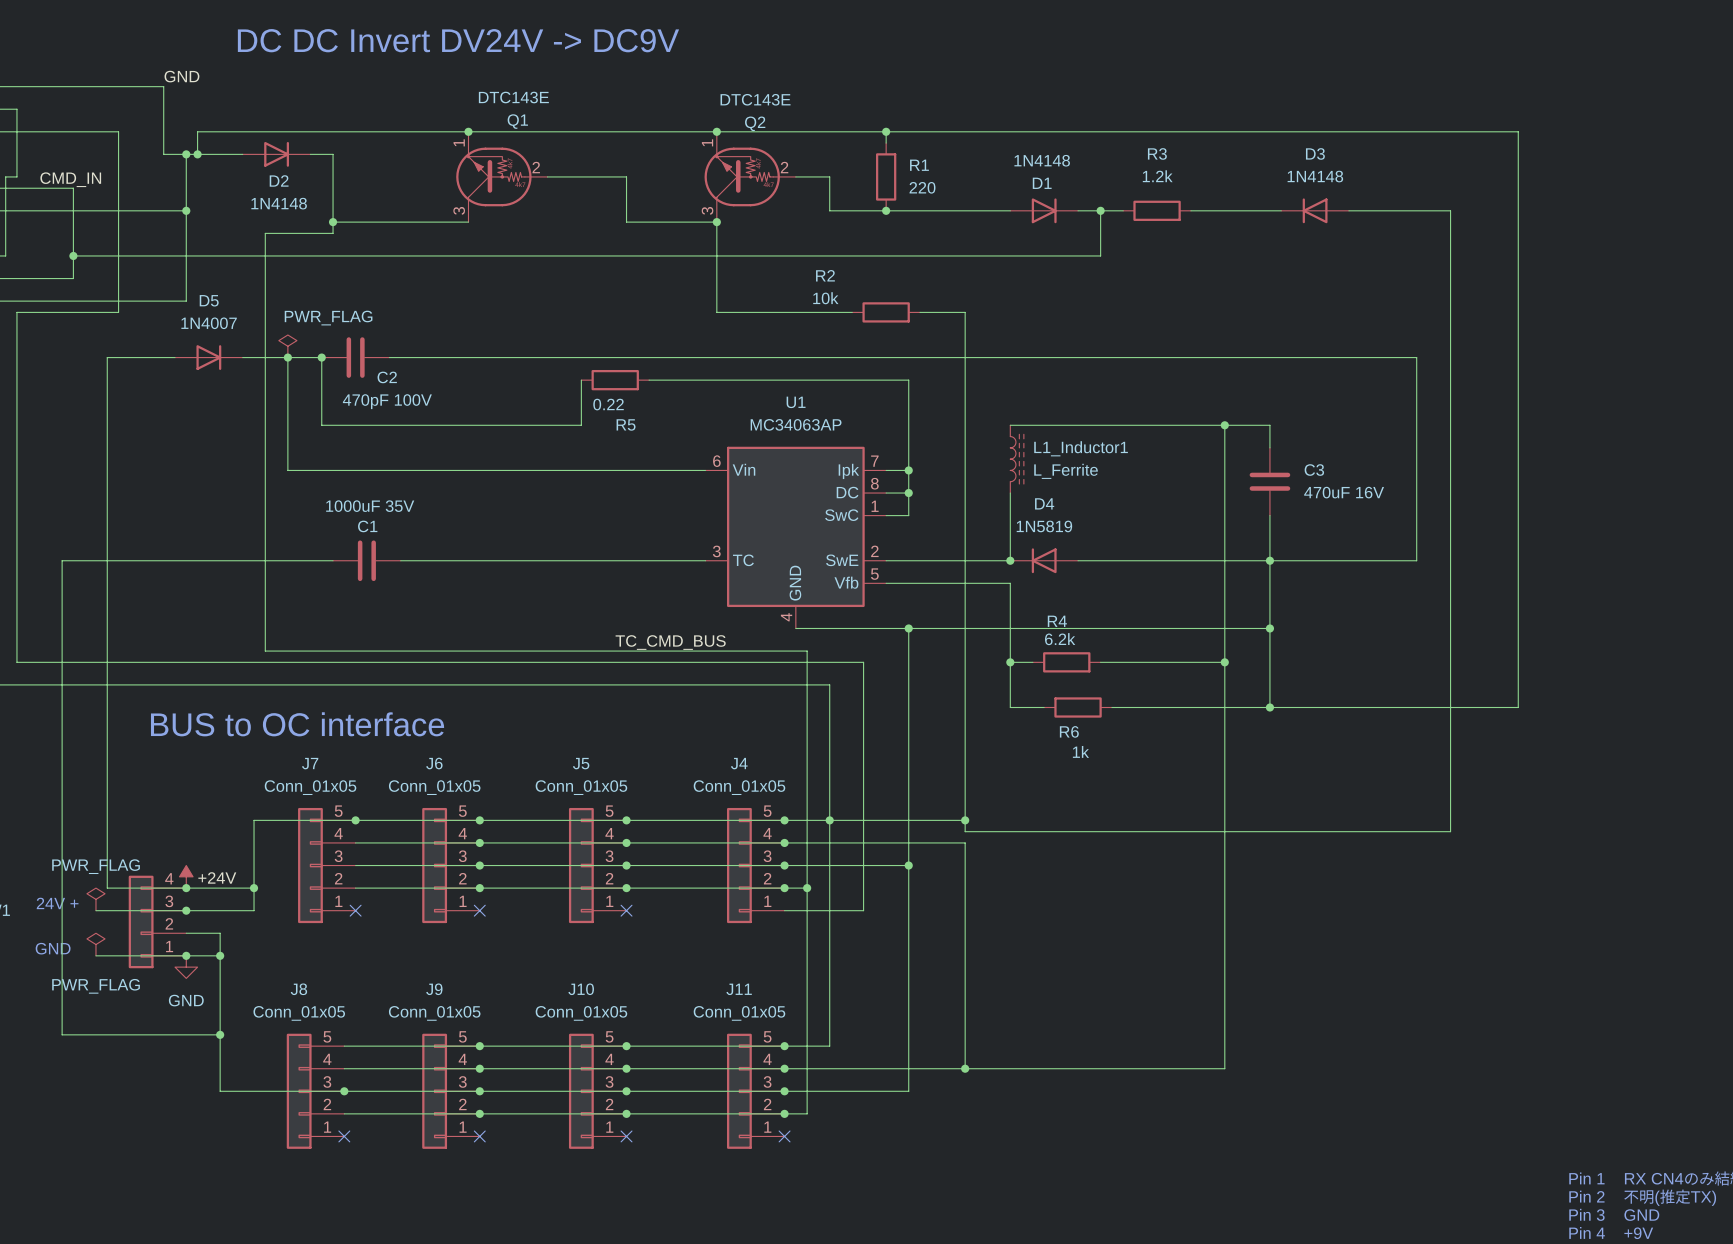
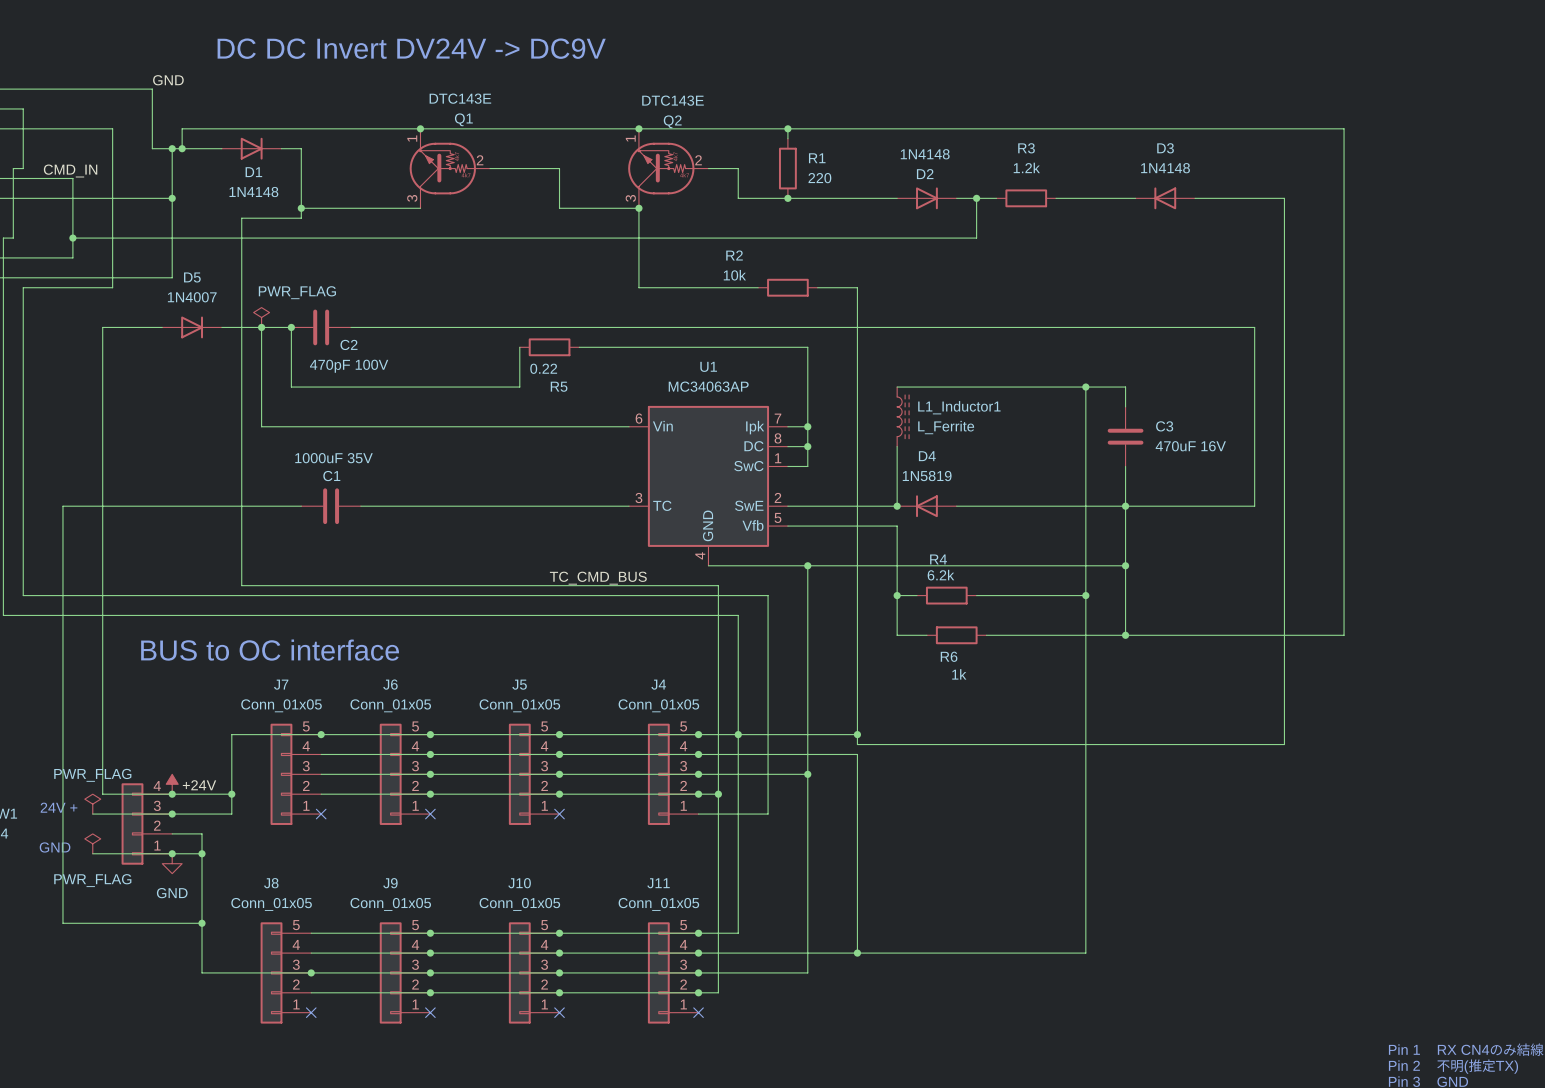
D2 name: D2 (279, 180) -> D1 (253, 172)
D1 name: D1 (1042, 183) -> D2 (925, 174)

